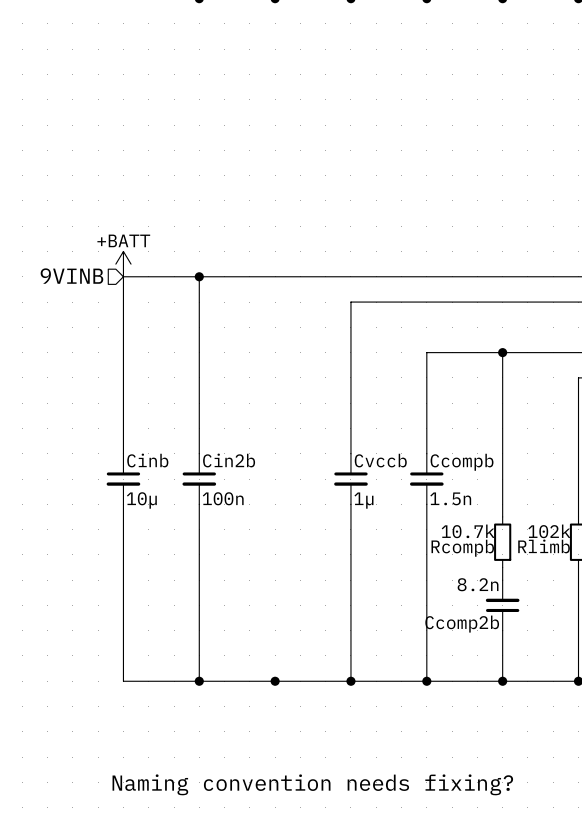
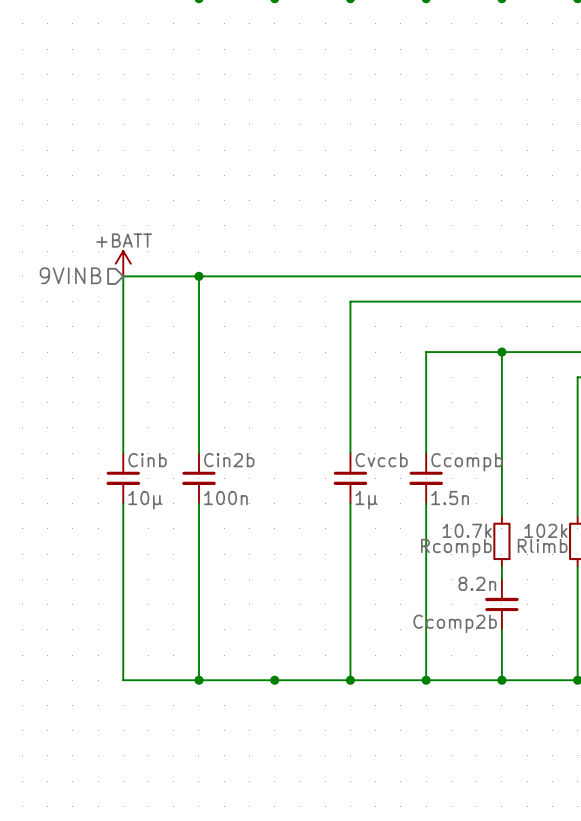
text: Naming convention needs fixing? (312, 784) -> none

